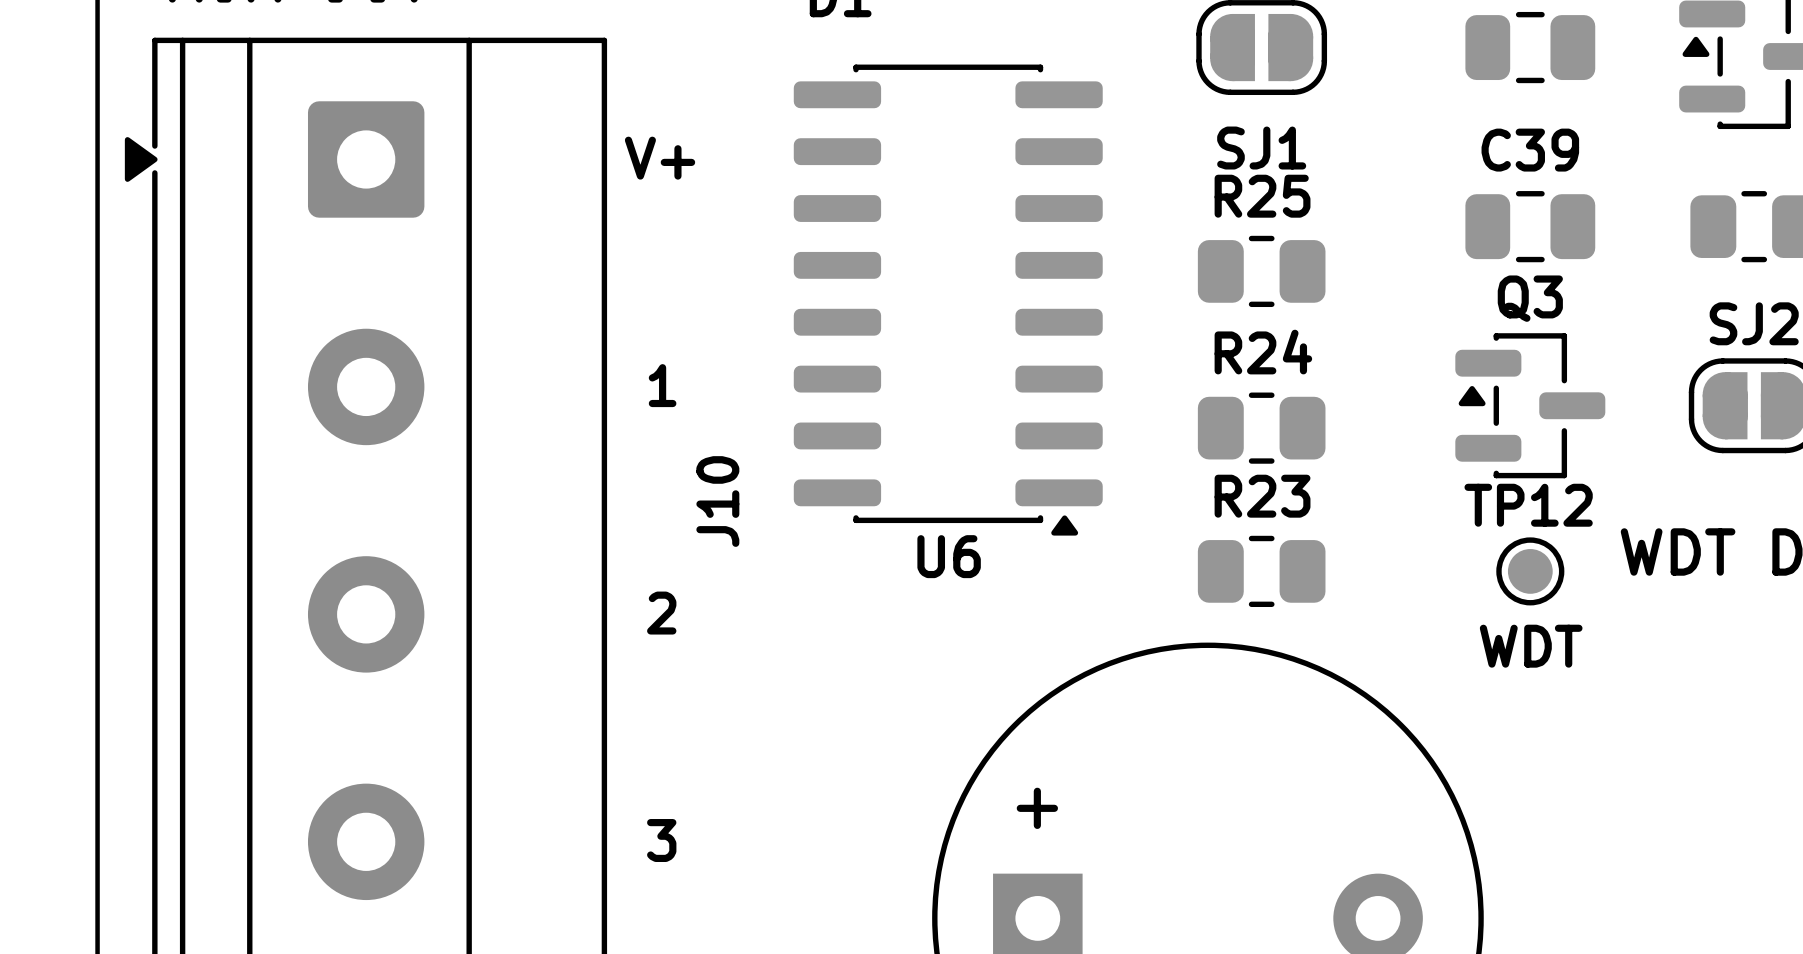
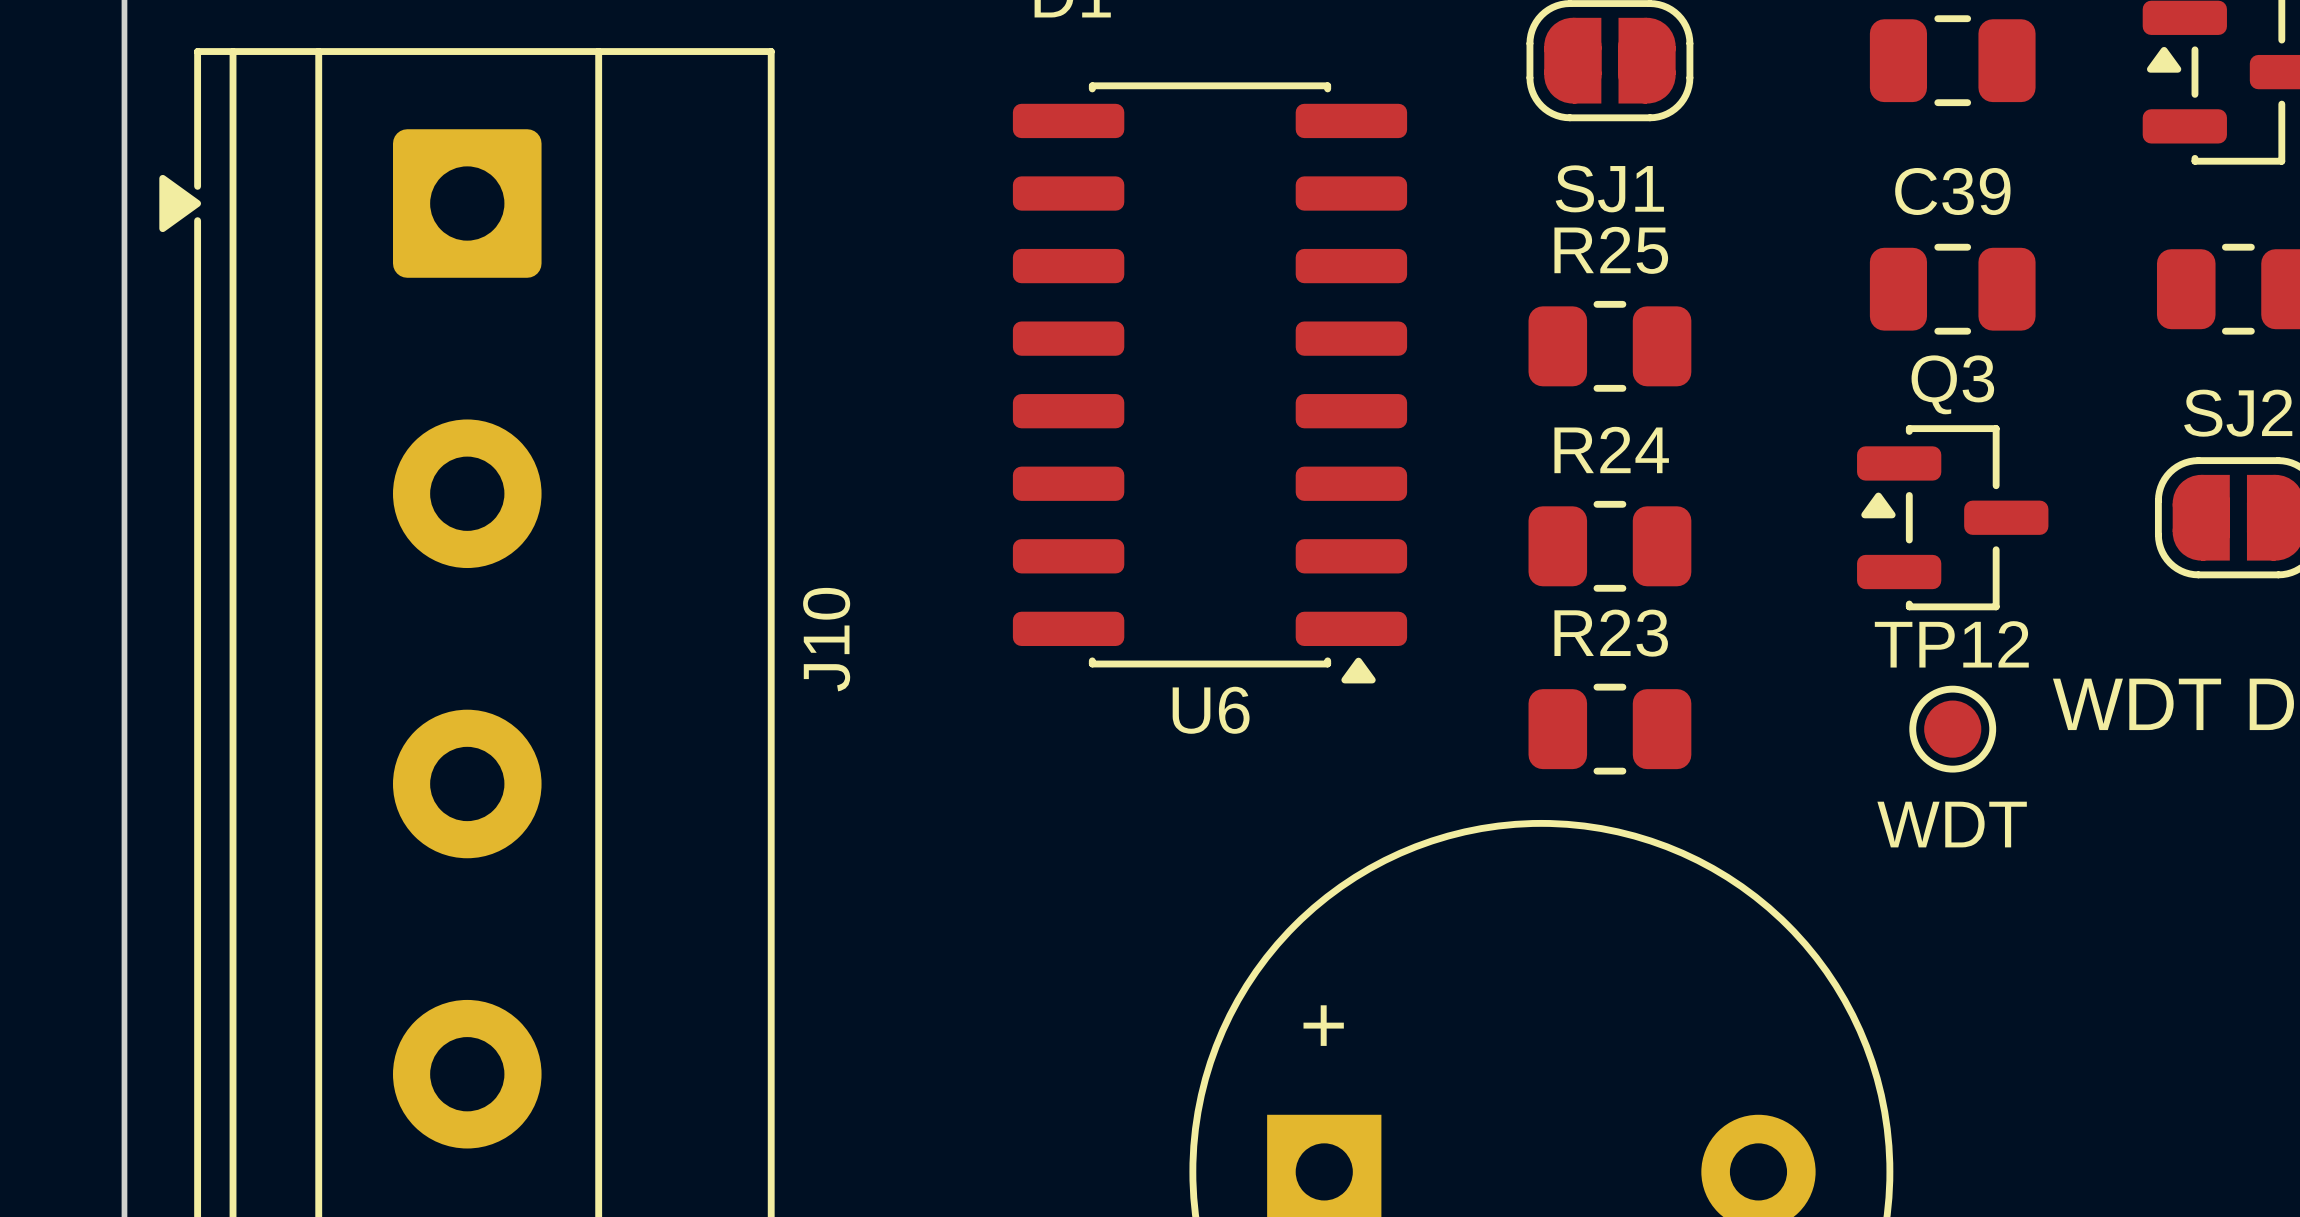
text: V+ (660, 158) -> none
text: 1 (662, 385) -> none
J10 name position: J10 (717, 501) -> J10 (826, 639)
text: 2 (661, 613) -> none
text: 3 (661, 840) -> none

